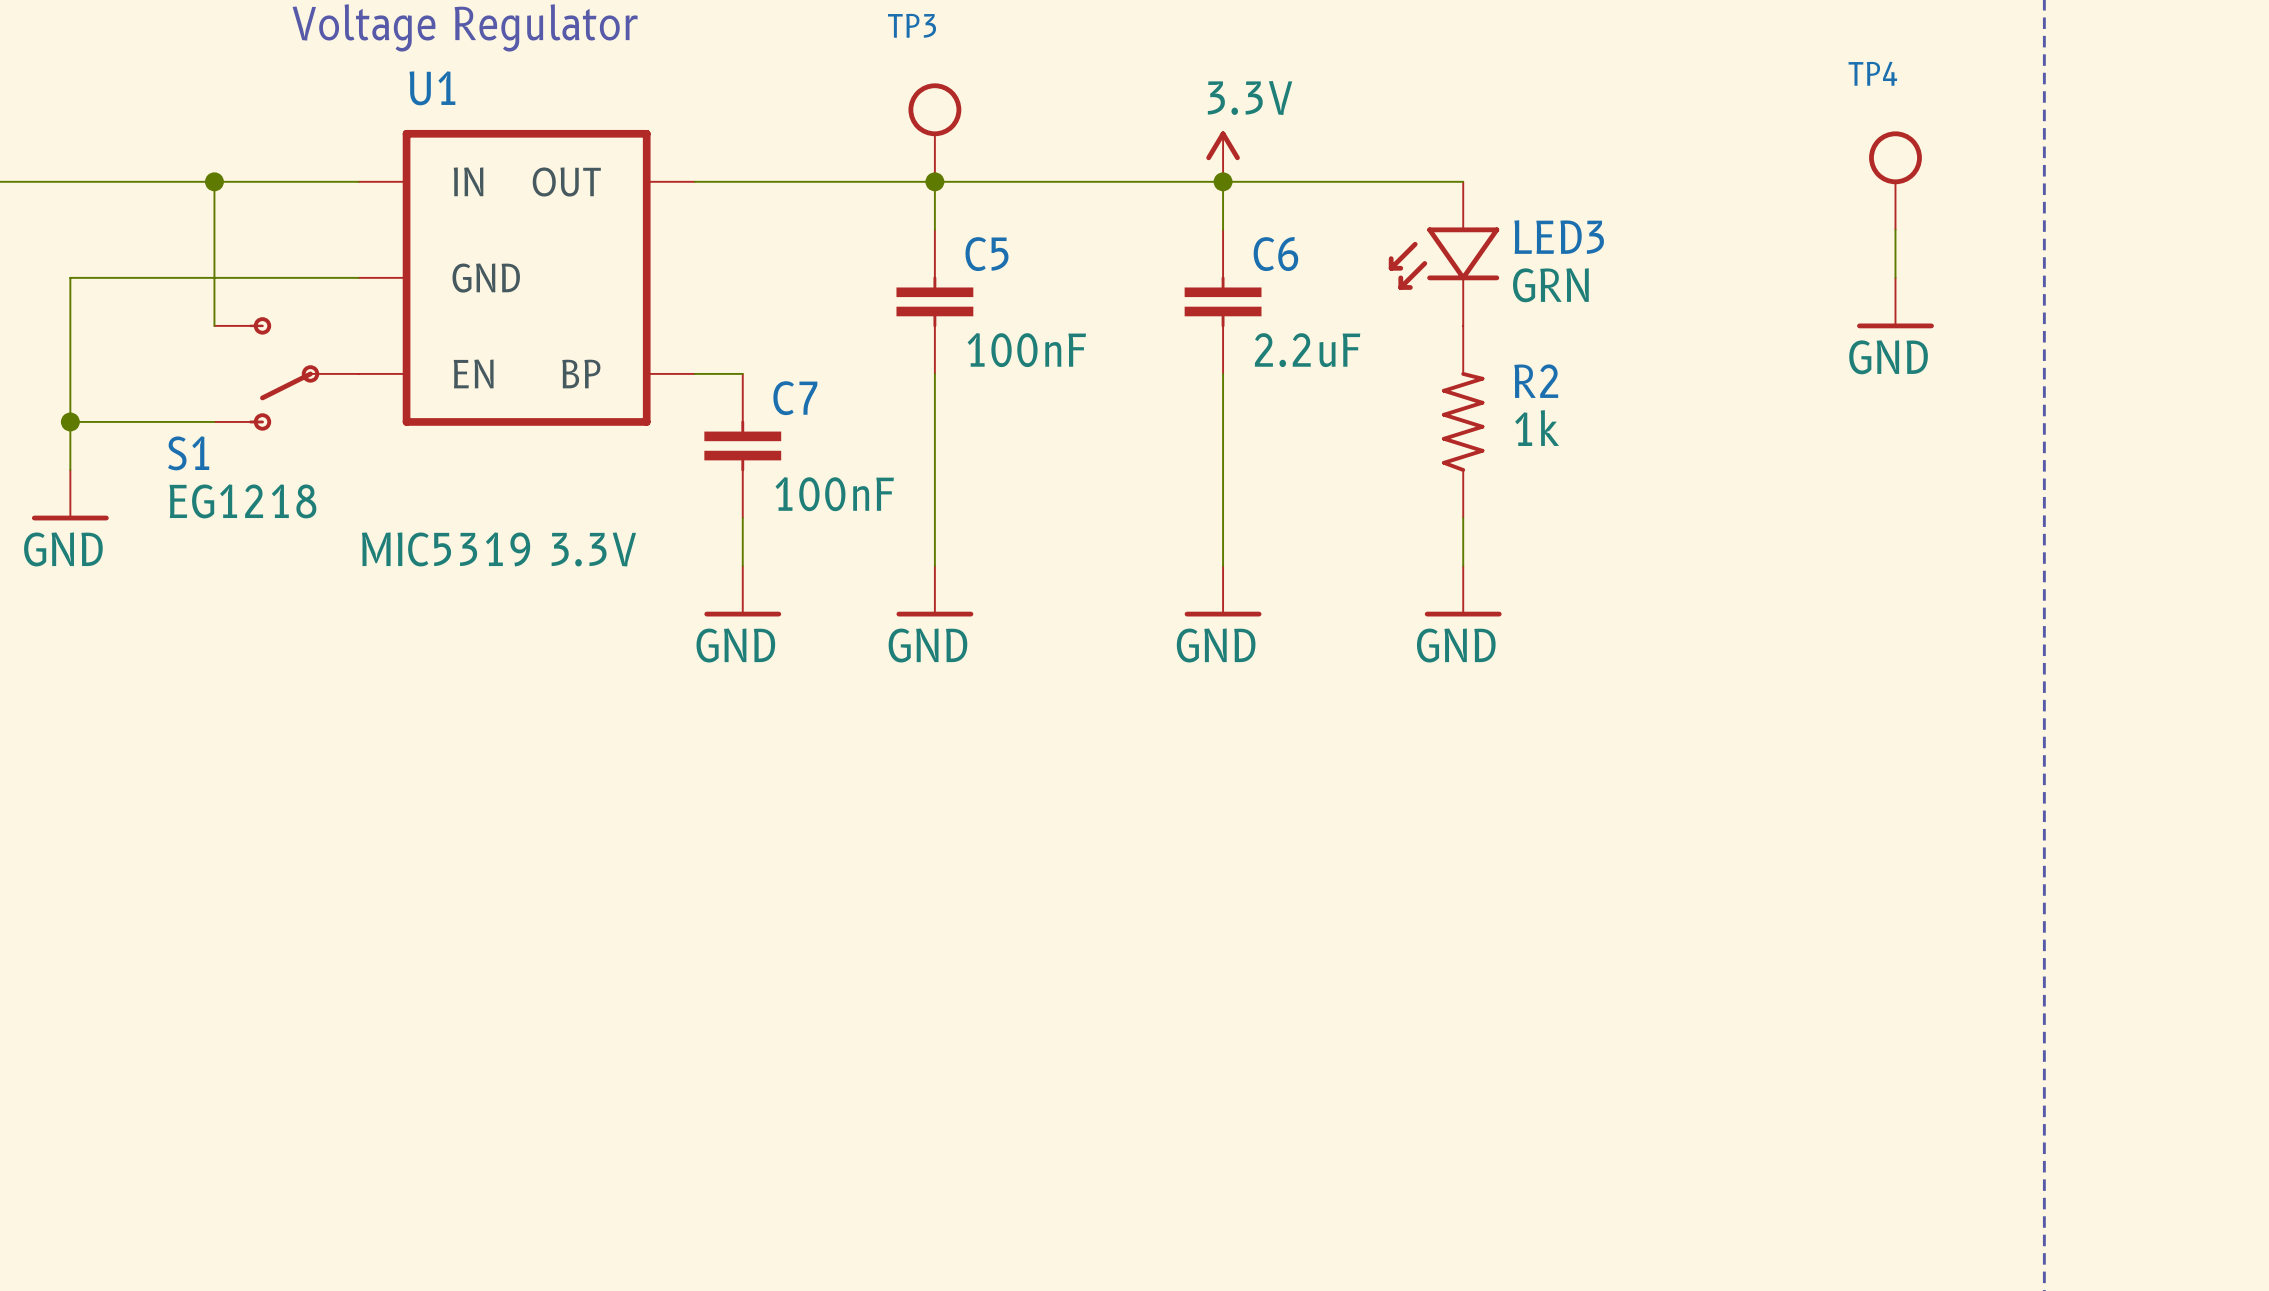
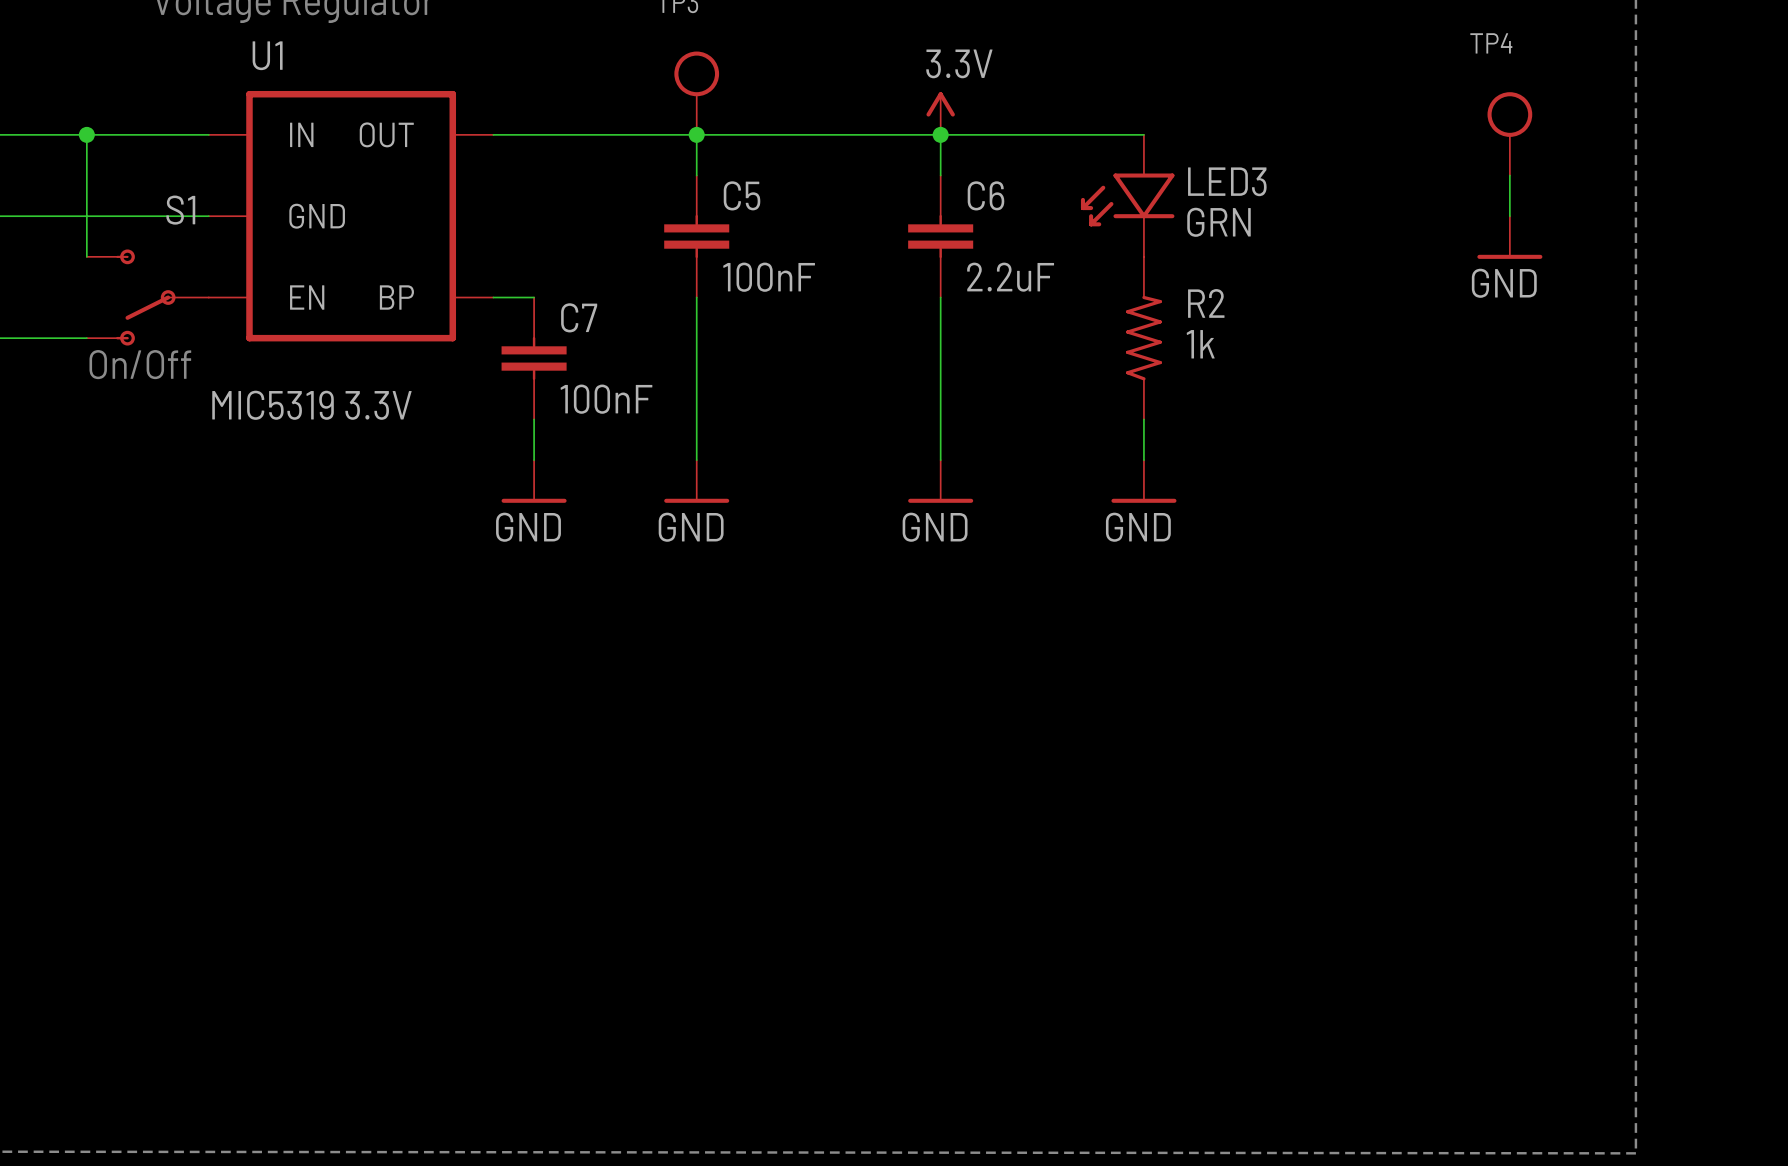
S1 name position: S1 (188, 453) -> S1 (180, 210)
text: none -> On/Off (140, 364)
S1 value: EG1218 (242, 501) -> none
U1 value position: MIC5319 3.3V (498, 549) -> MIC5319 3.3V (311, 405)

